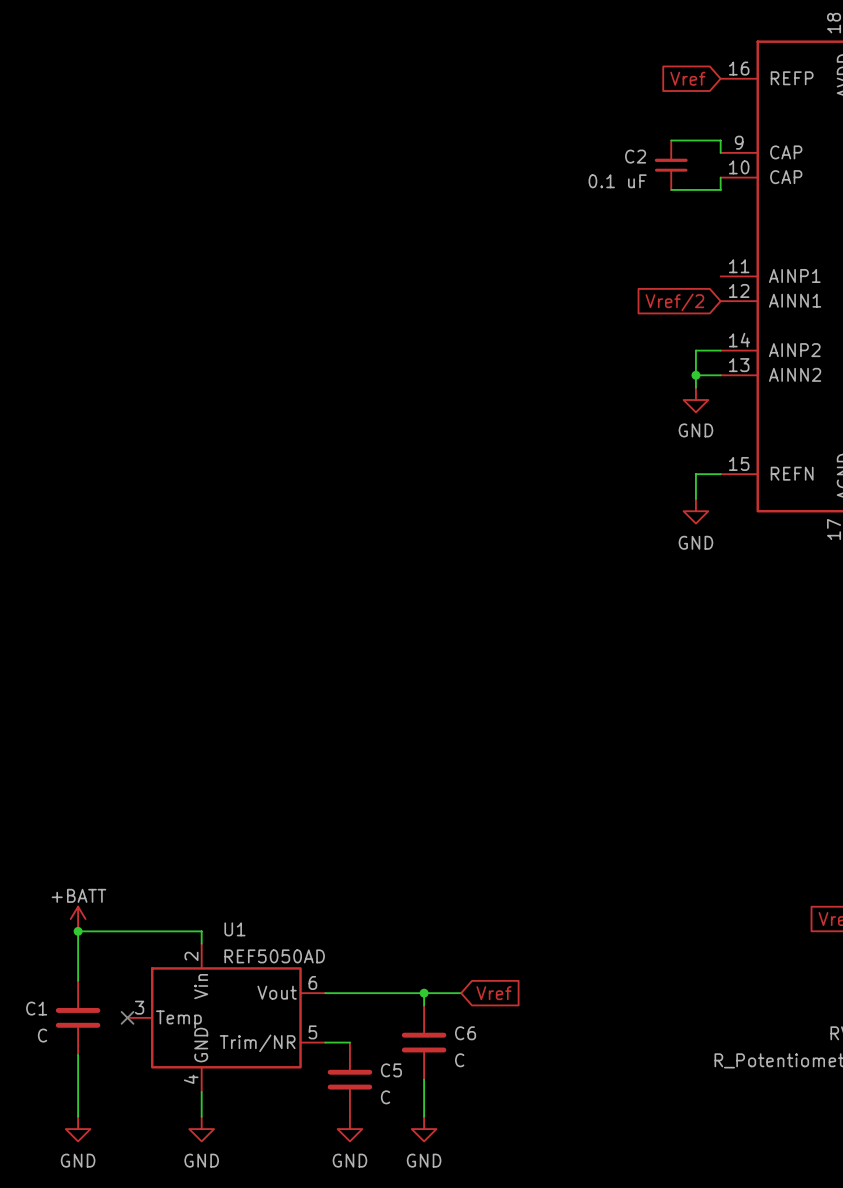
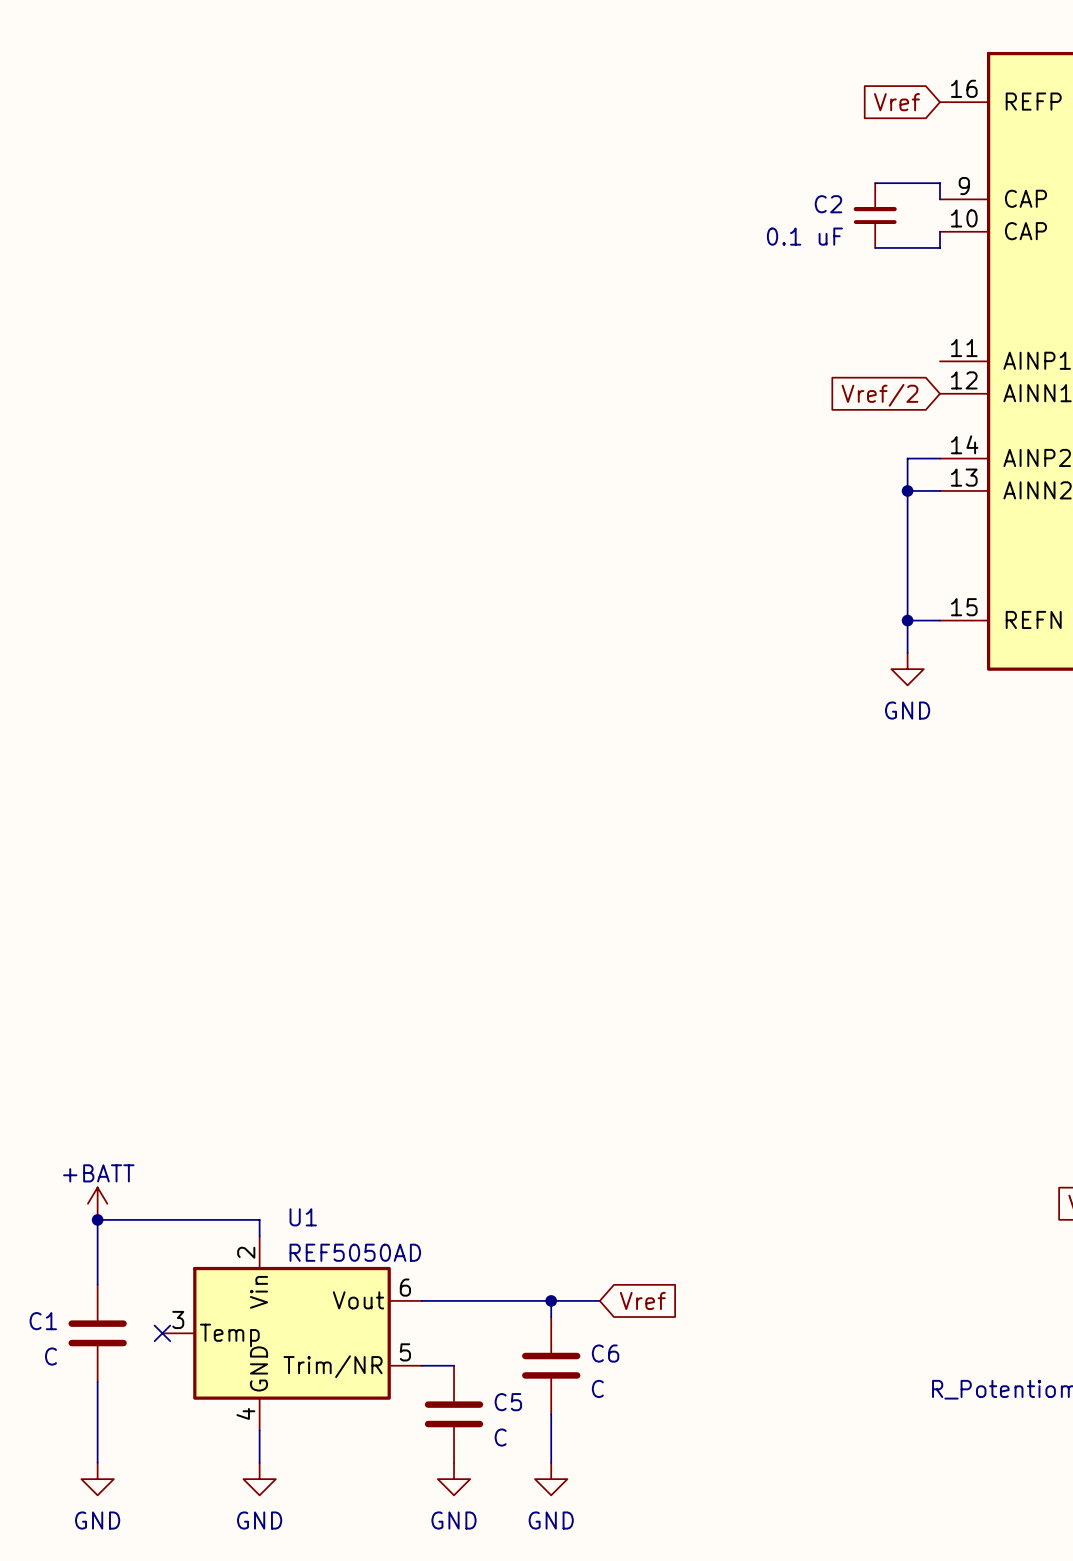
wire: none -> (907, 507) (907, 620)
power symbol: GND (695, 400) -> none
junction: none -> (907, 620)

